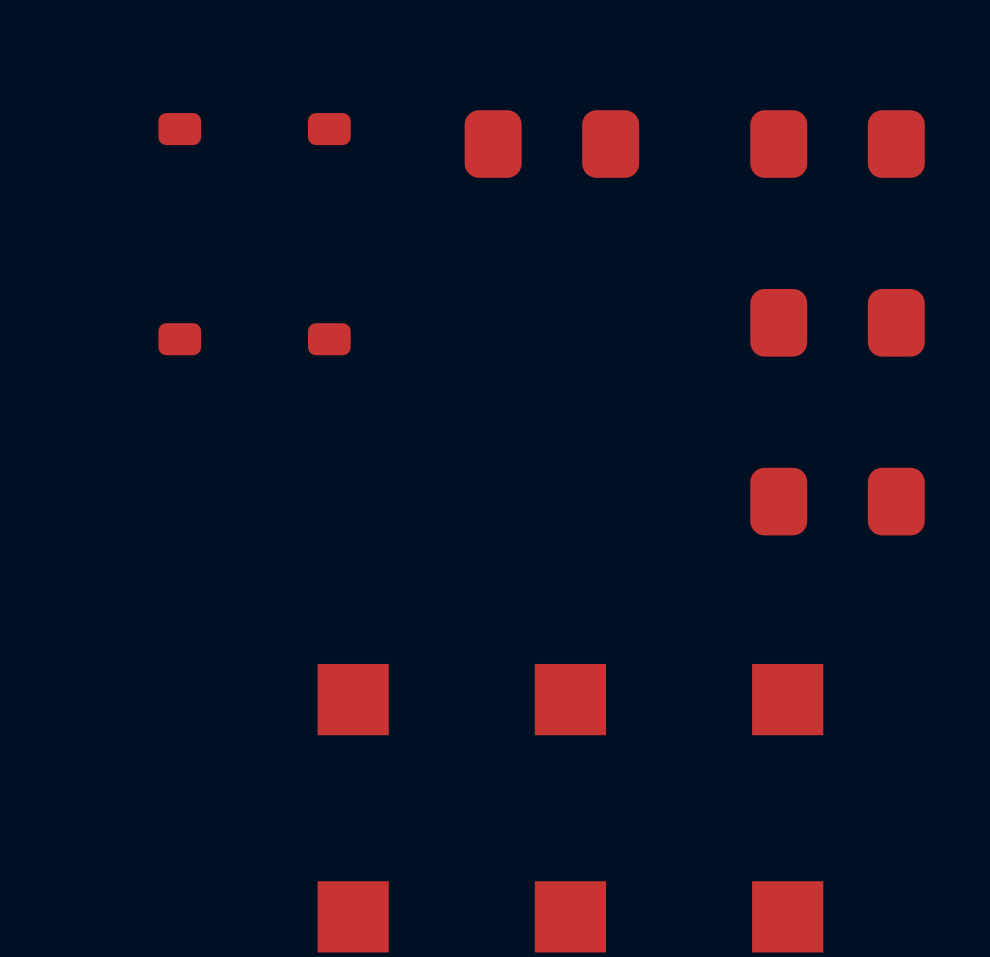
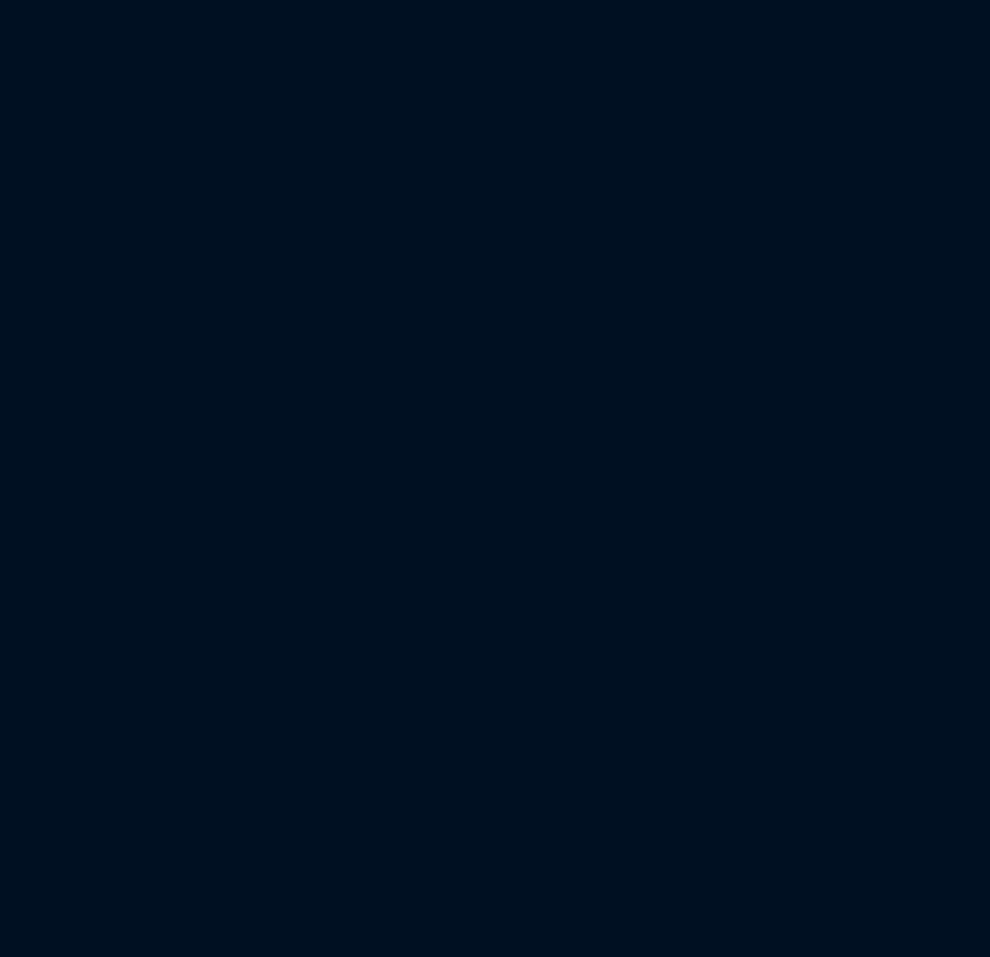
part: (254, 129) -> none
part: (551, 144) -> none
part: (837, 144) -> none
part: (837, 322) -> none
part: (254, 339) -> none
part: (837, 501) -> none
part: (353, 699) -> none
part: (570, 699) -> none
part: (787, 699) -> none
part: (353, 916) -> none
part: (570, 916) -> none
part: (787, 916) -> none

